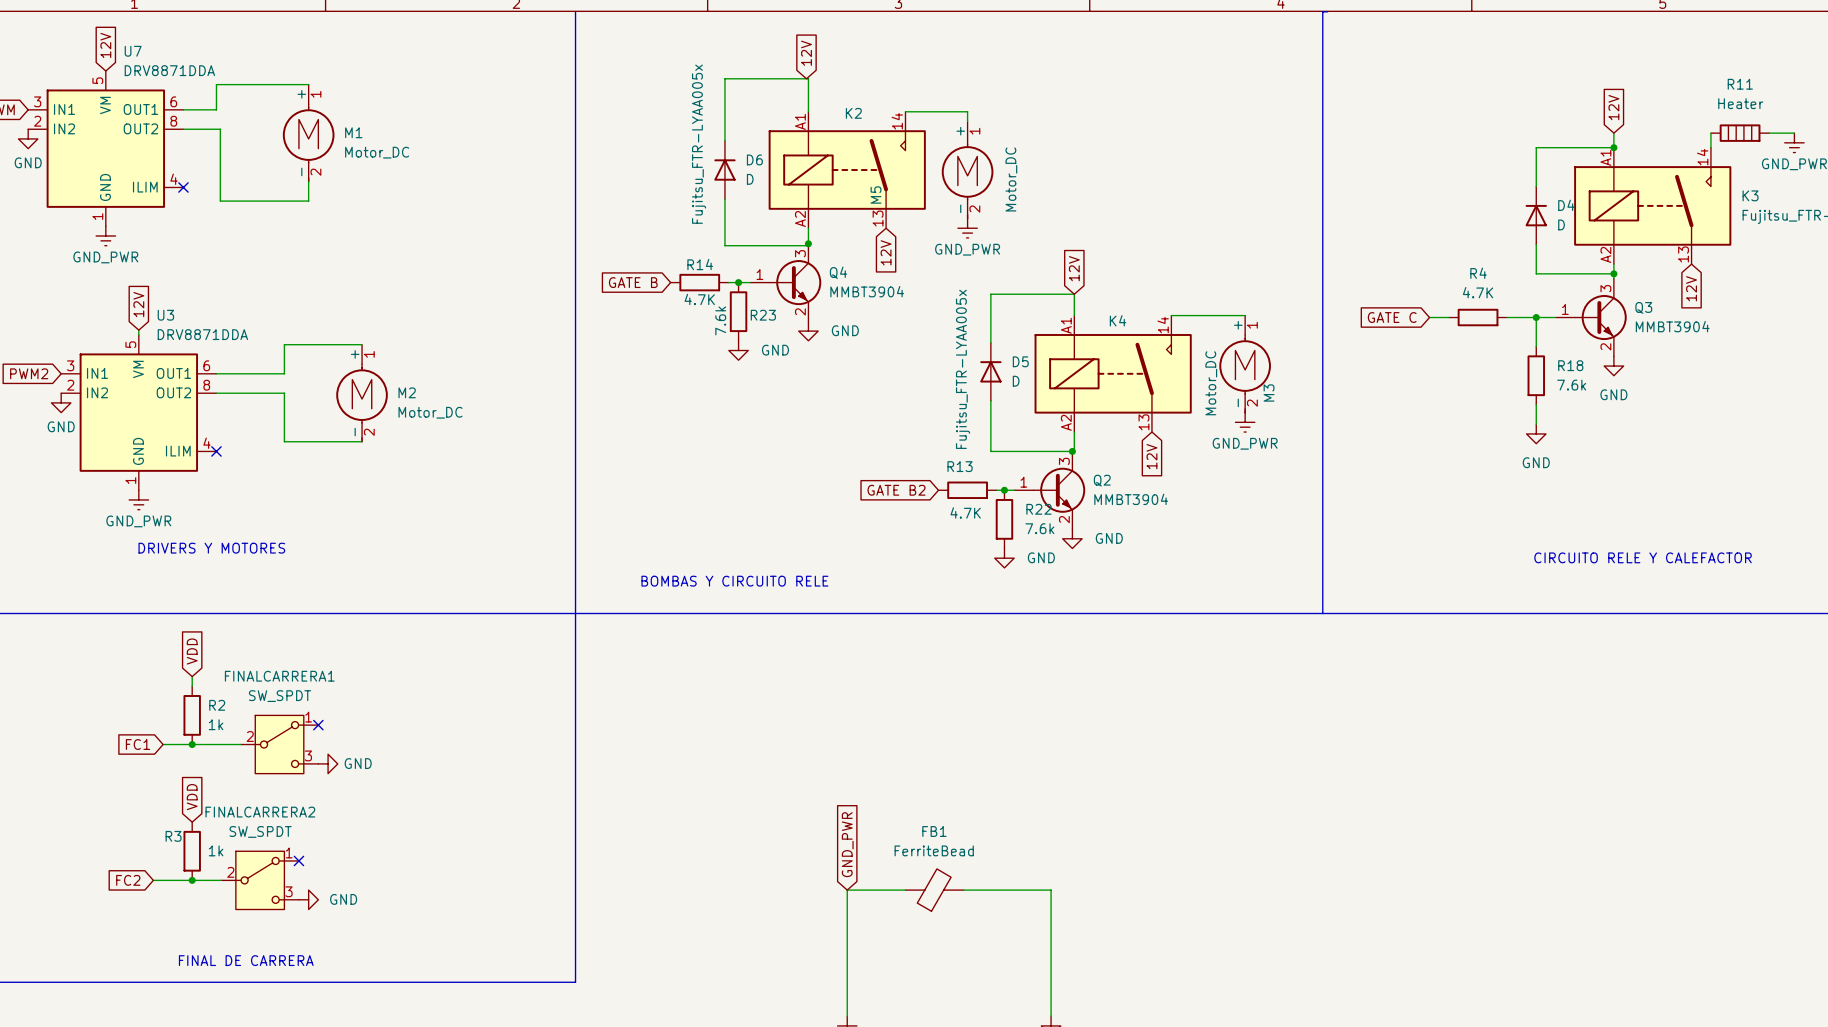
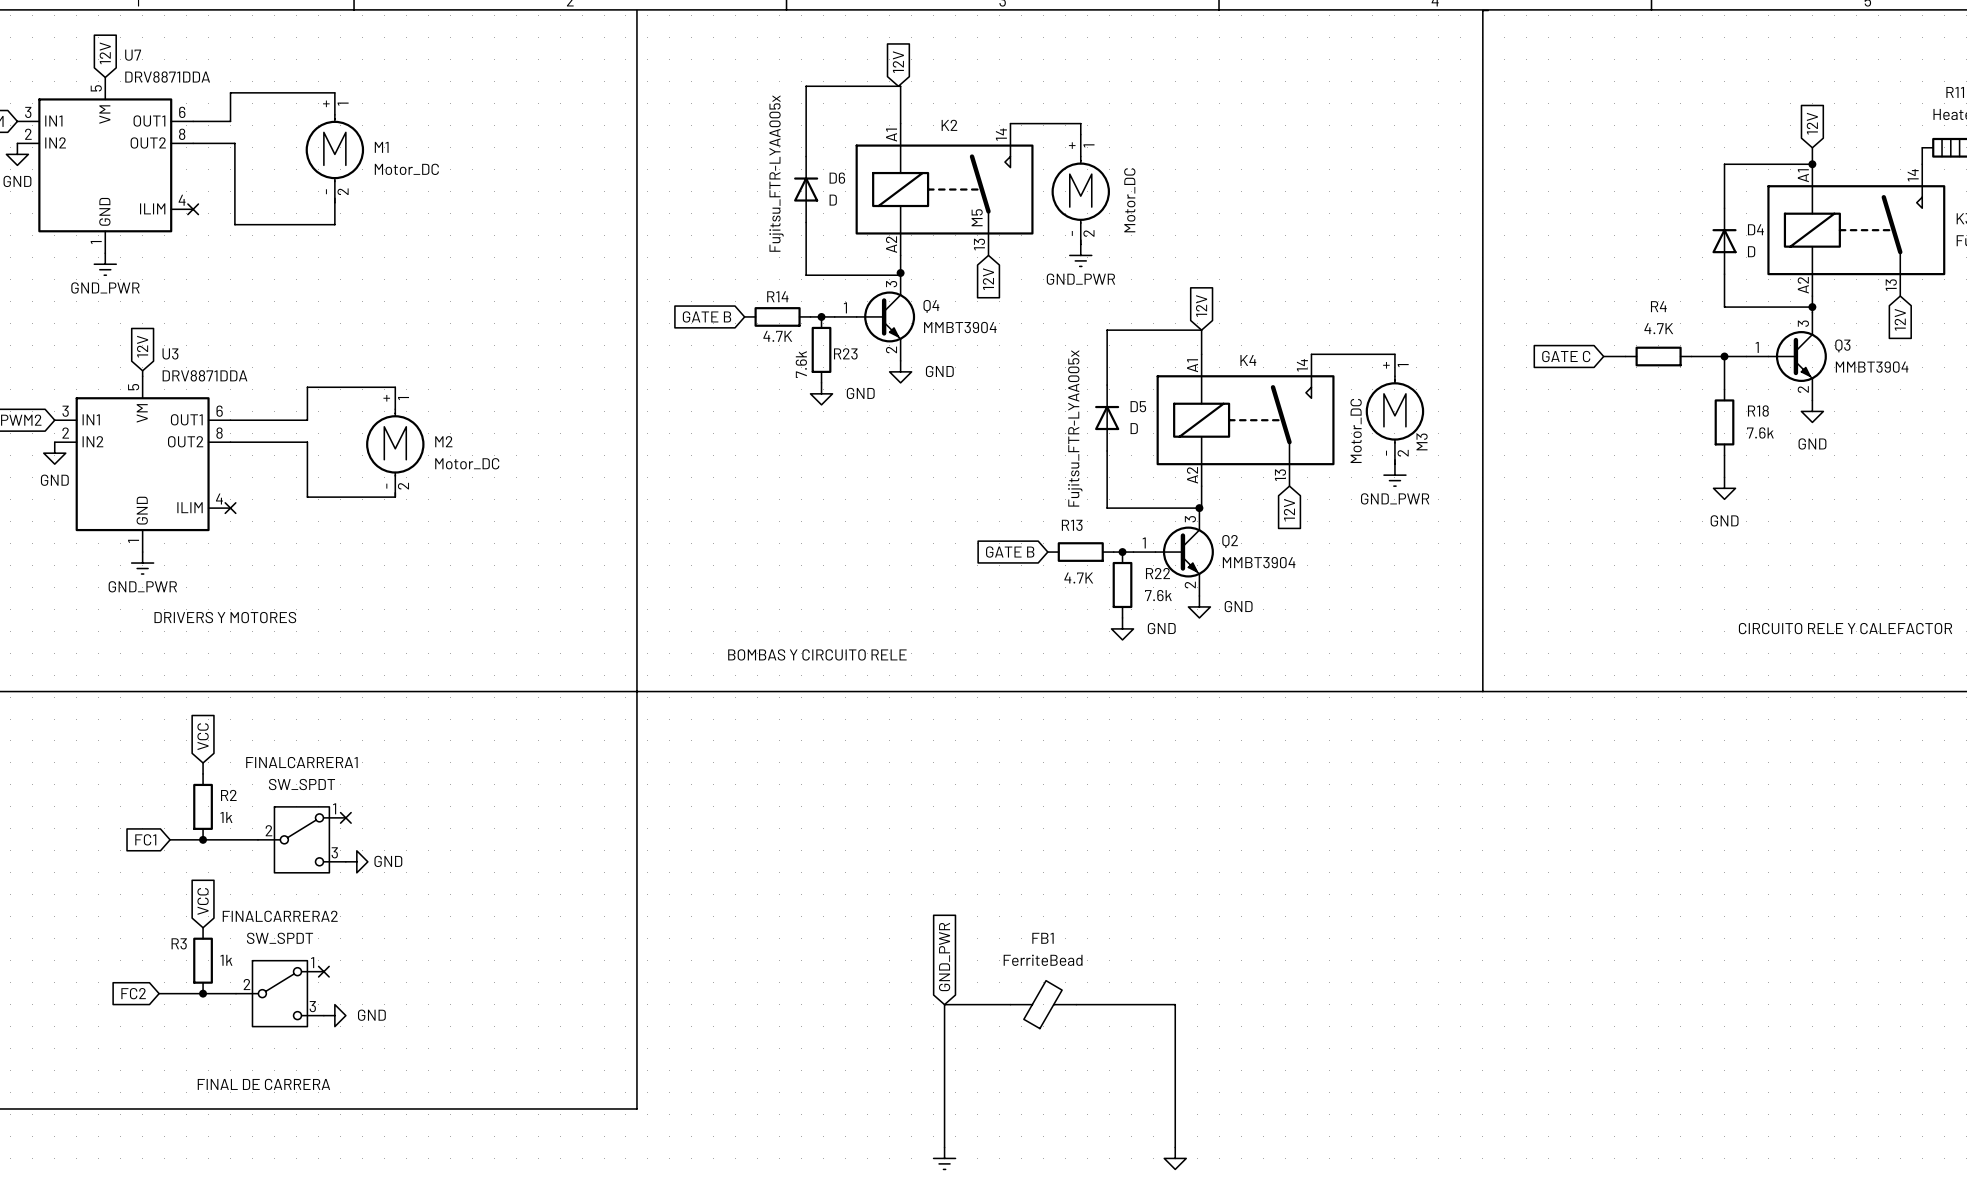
global label: GATE B2 (896, 490) -> GATE B (1010, 552)
global label: VDD (192, 651) -> VCC (203, 736)
global label: VDD (192, 797) -> VCC (203, 901)

